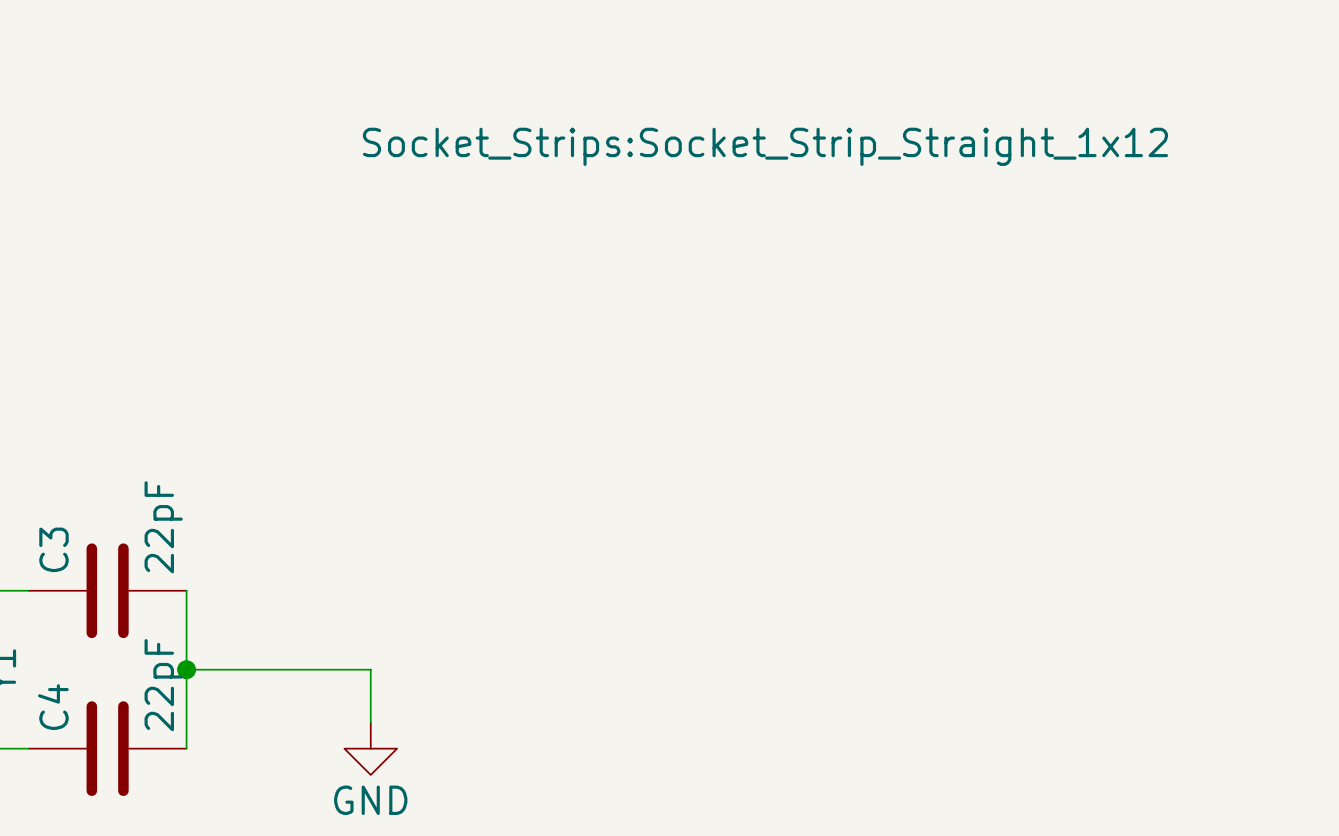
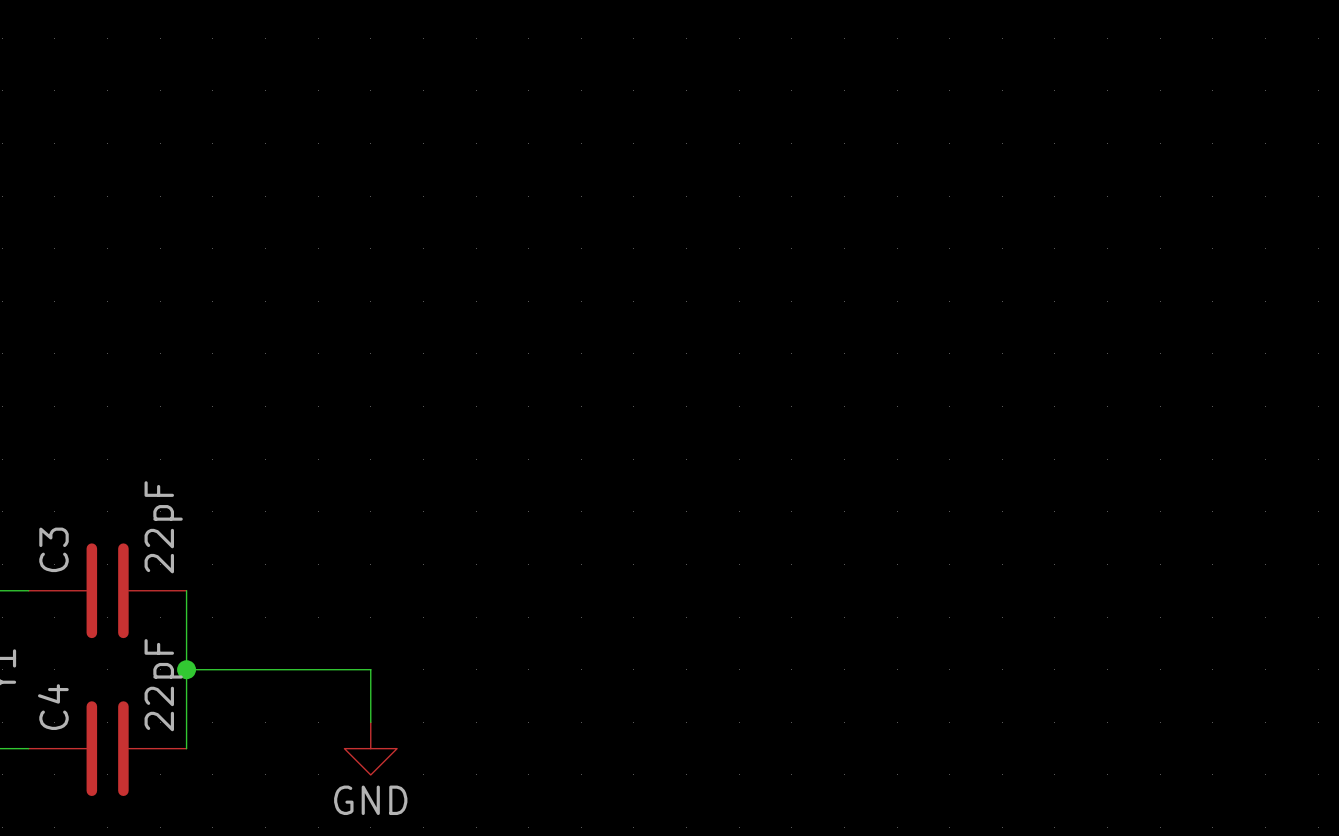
part text: Socket_Strips:Socket_Strip_Straight_1x12 (765, 146) -> none

